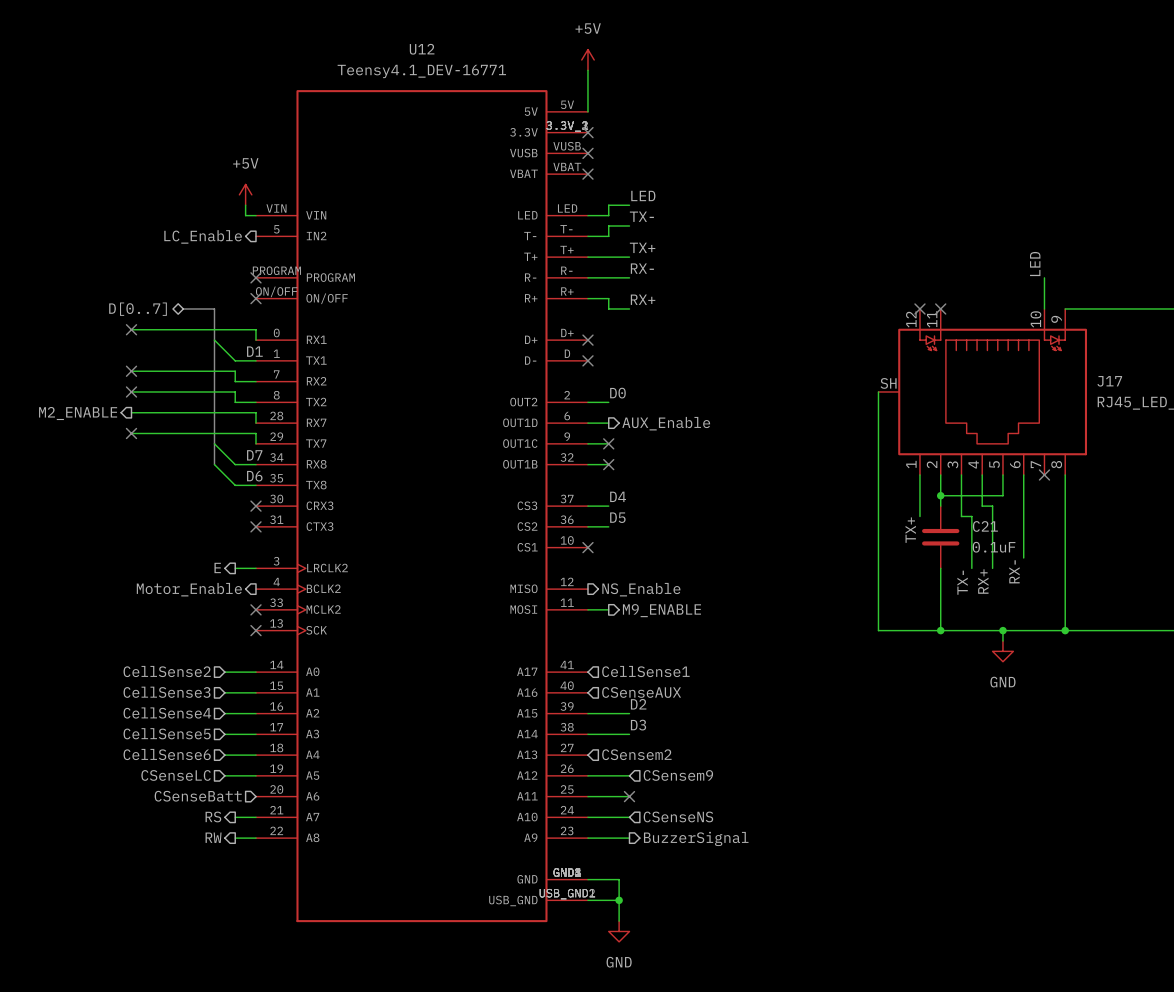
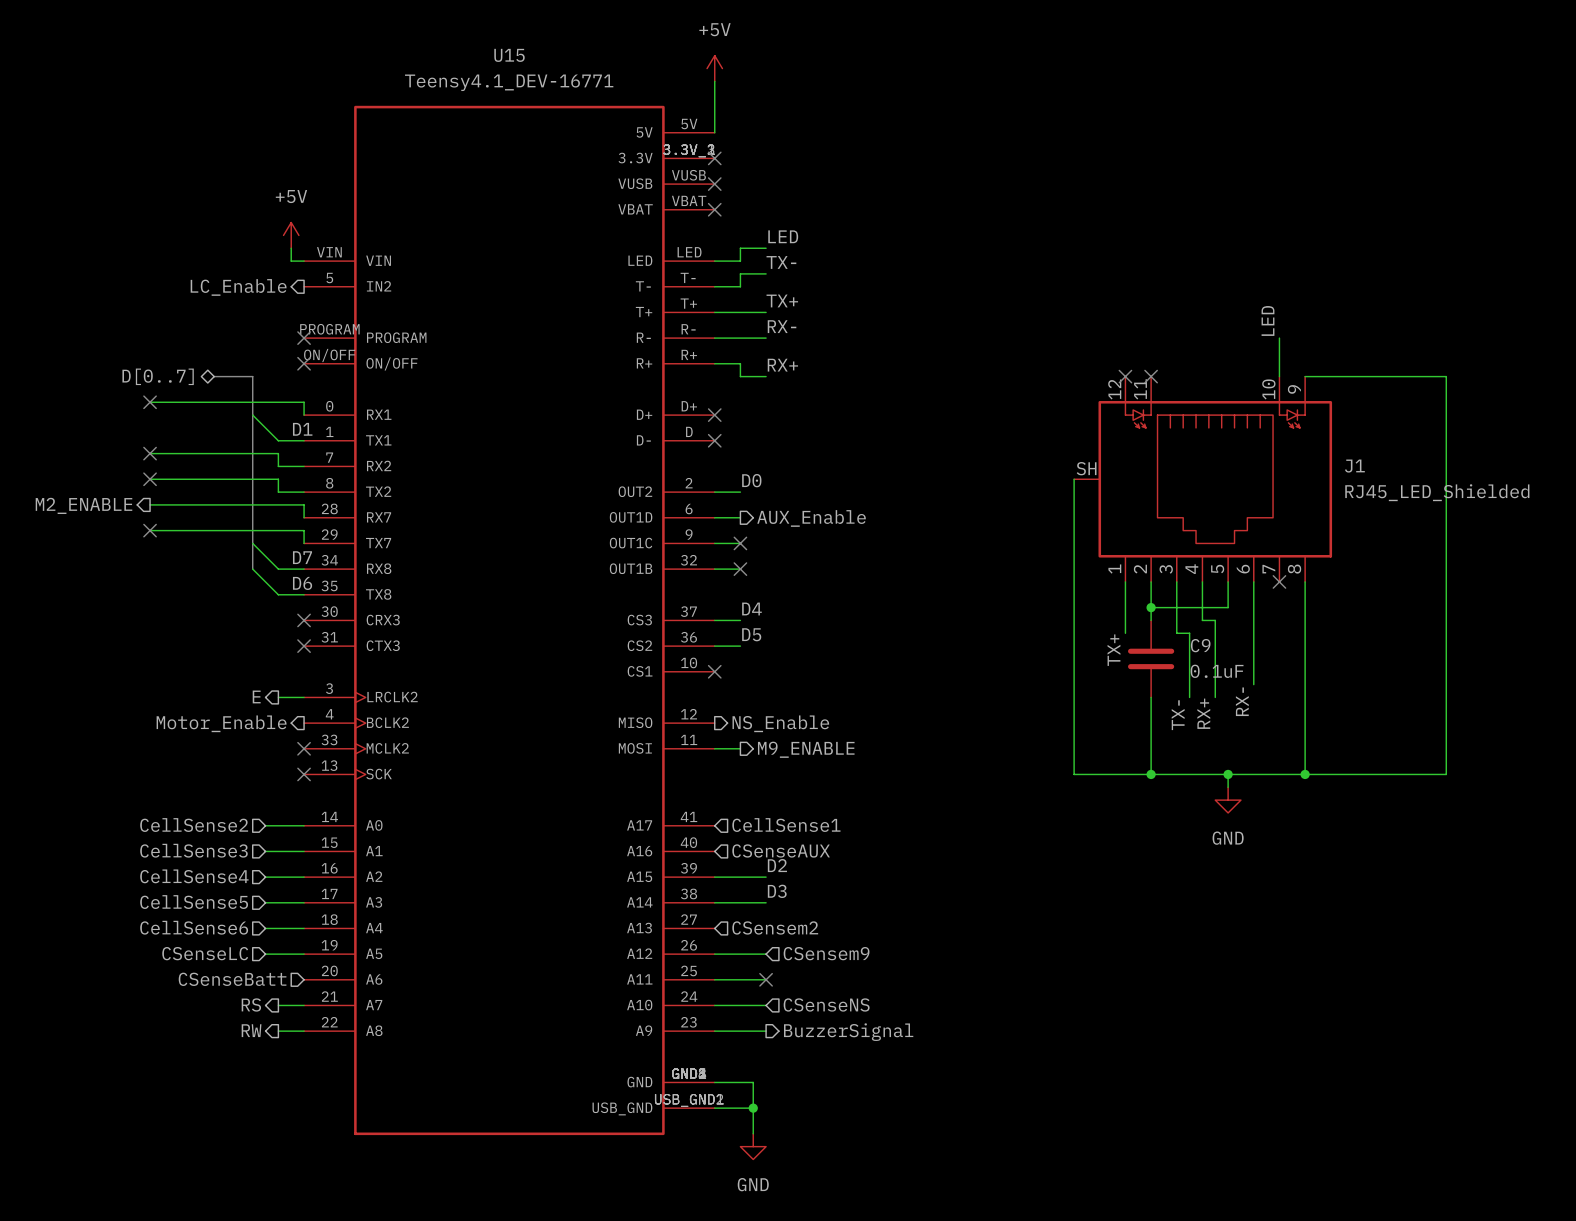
U12 name: U12 (422, 49) -> U15 (509, 55)
J17 name: J17 (1109, 381) -> J1 (1354, 466)
C21 name: C21 (985, 526) -> C9 (1200, 645)

